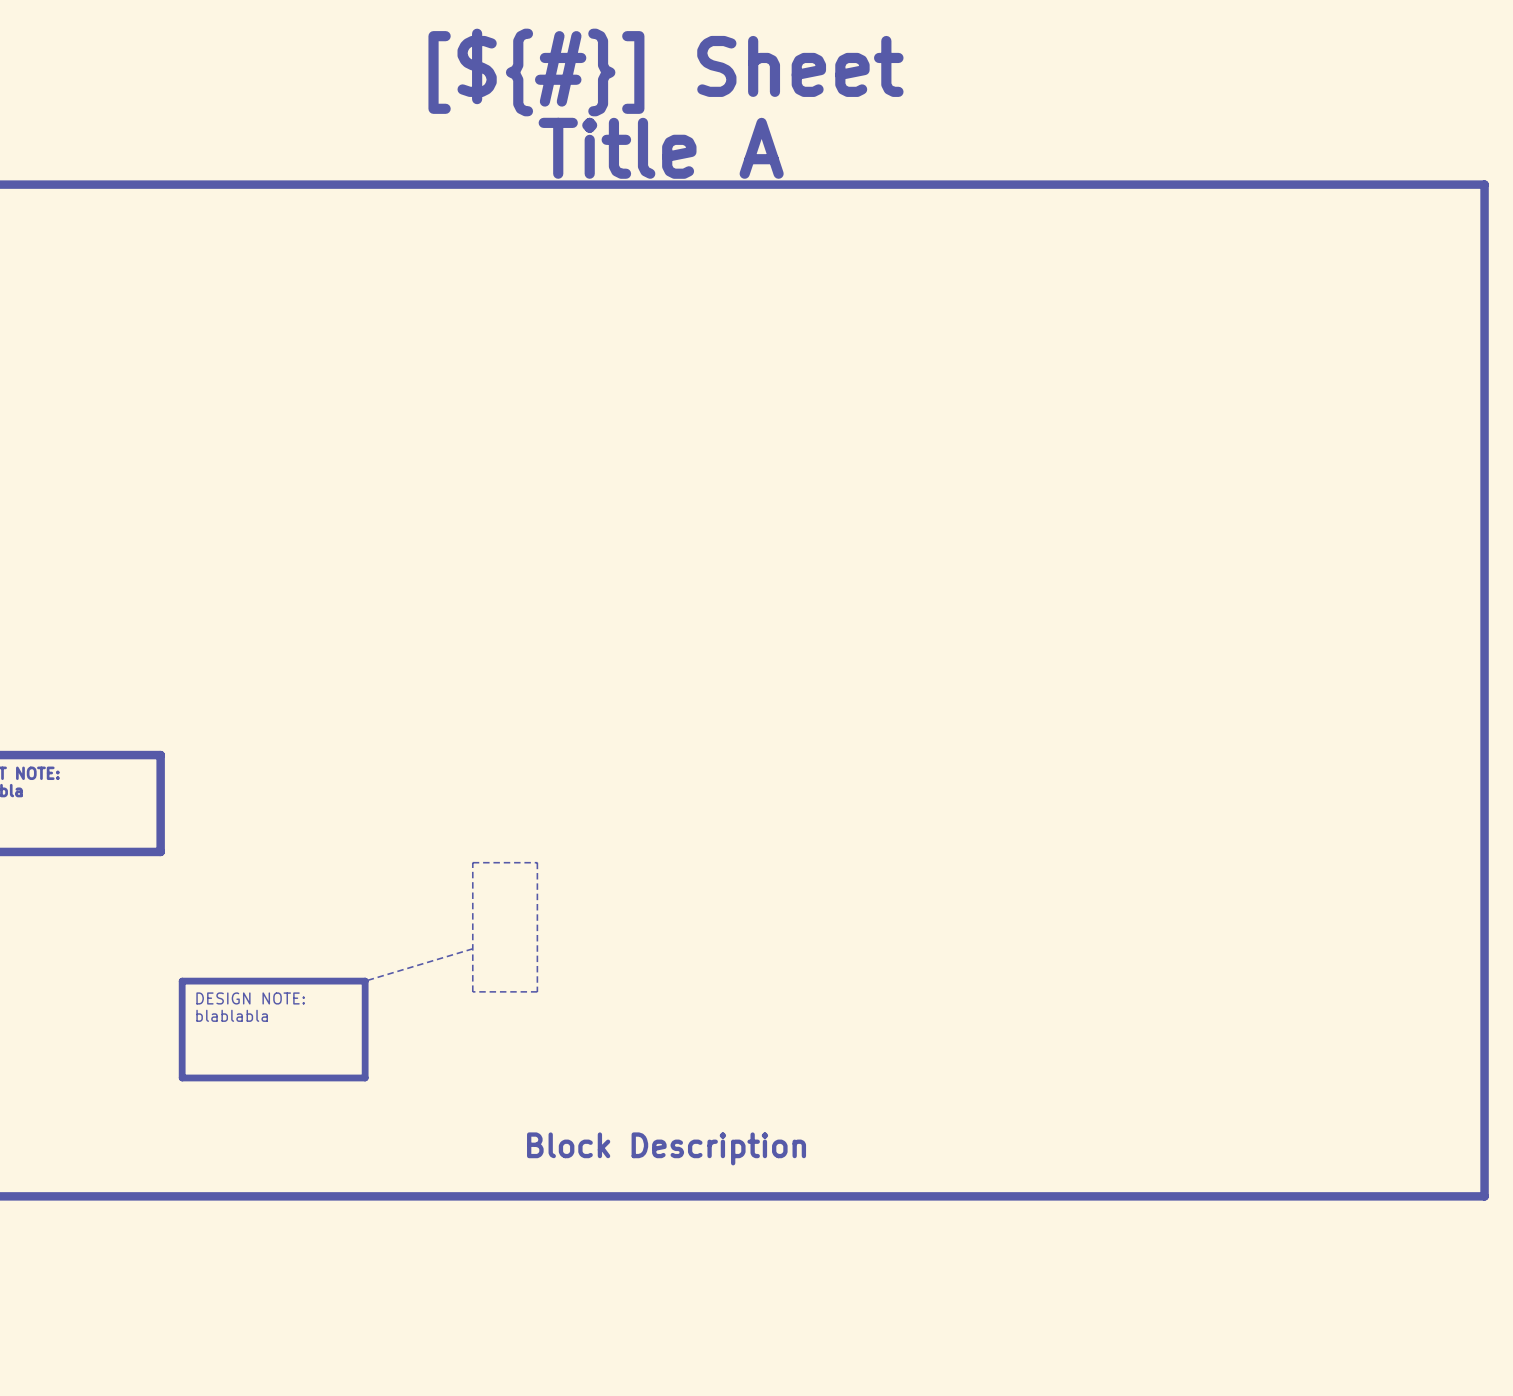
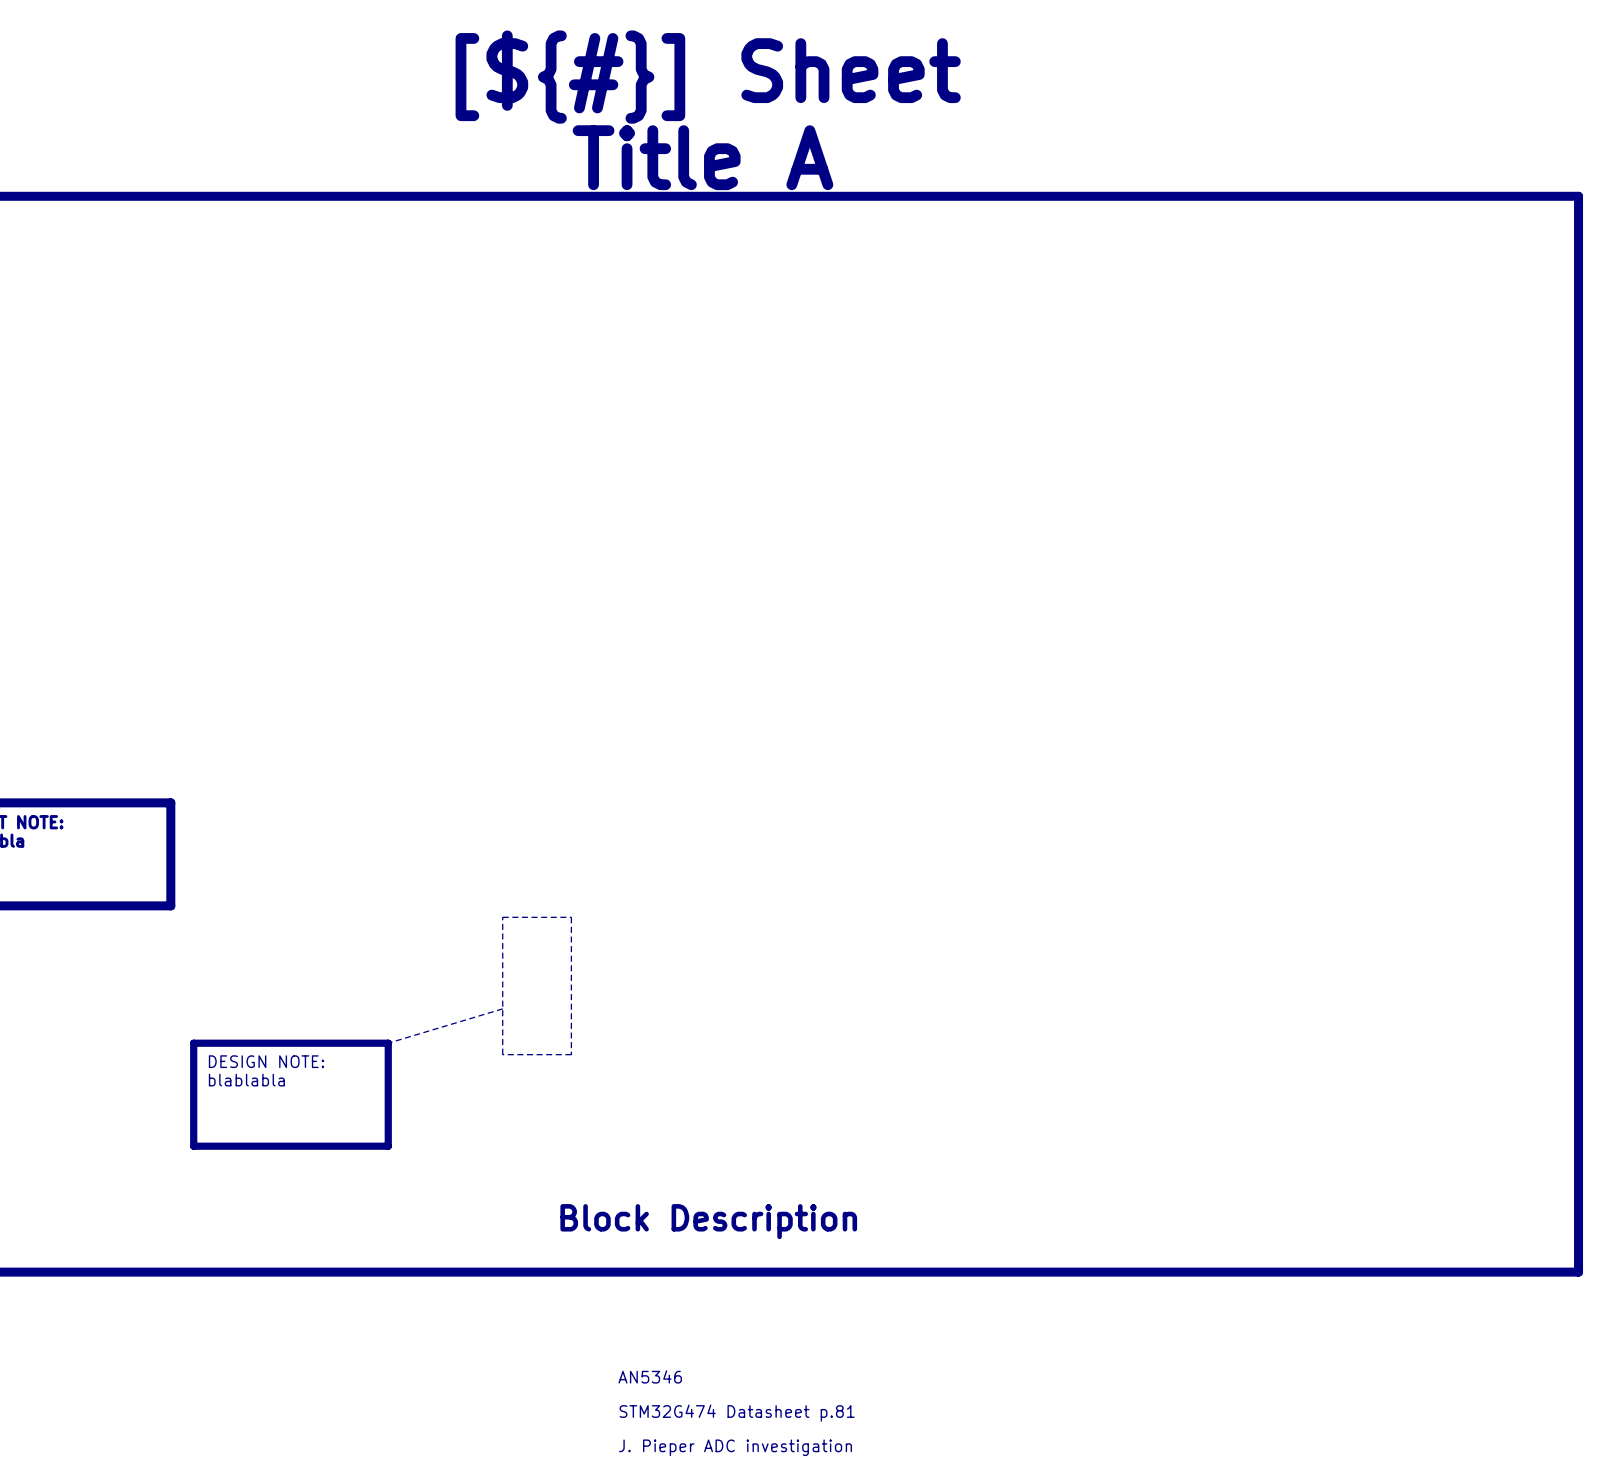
text: none -> AN5346 (650, 1376)
text: none -> STM32G474 Datasheet p.81 (737, 1413)
text: none -> J. Pieper ADC investigation (735, 1447)

